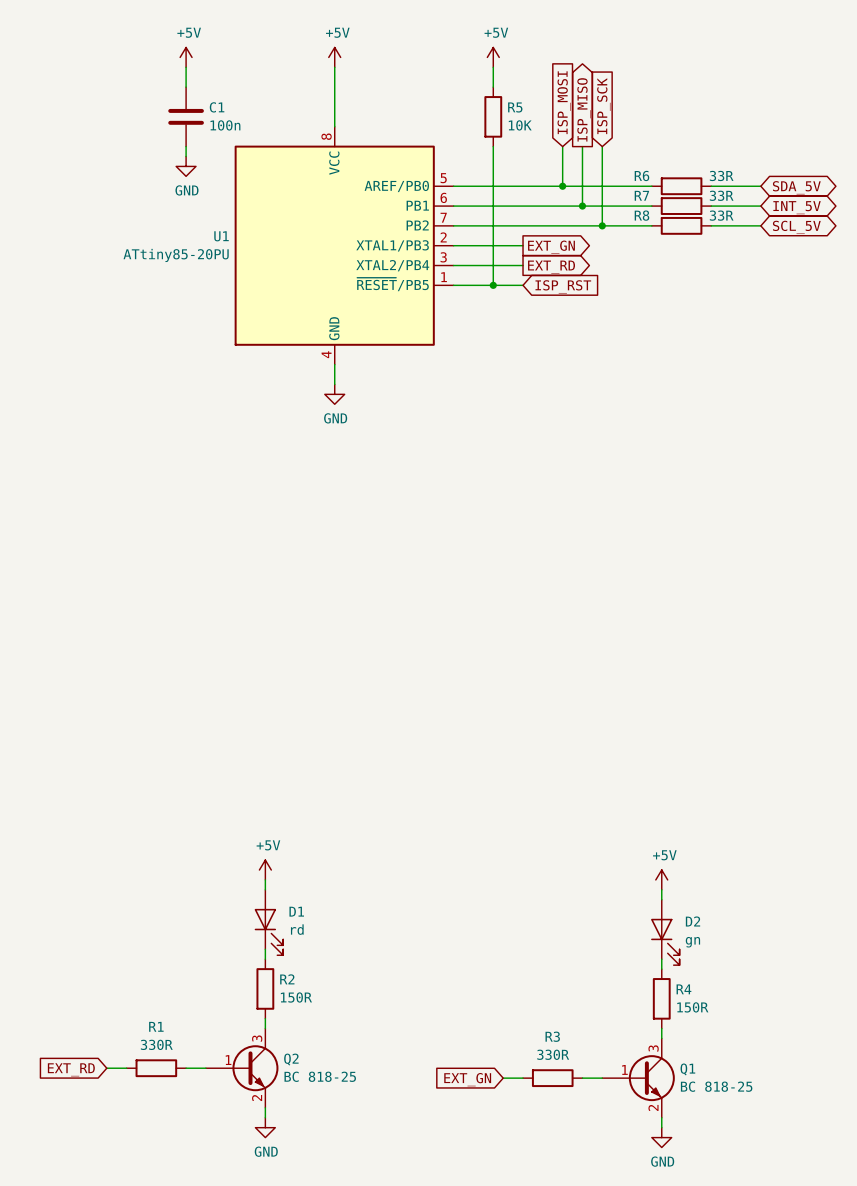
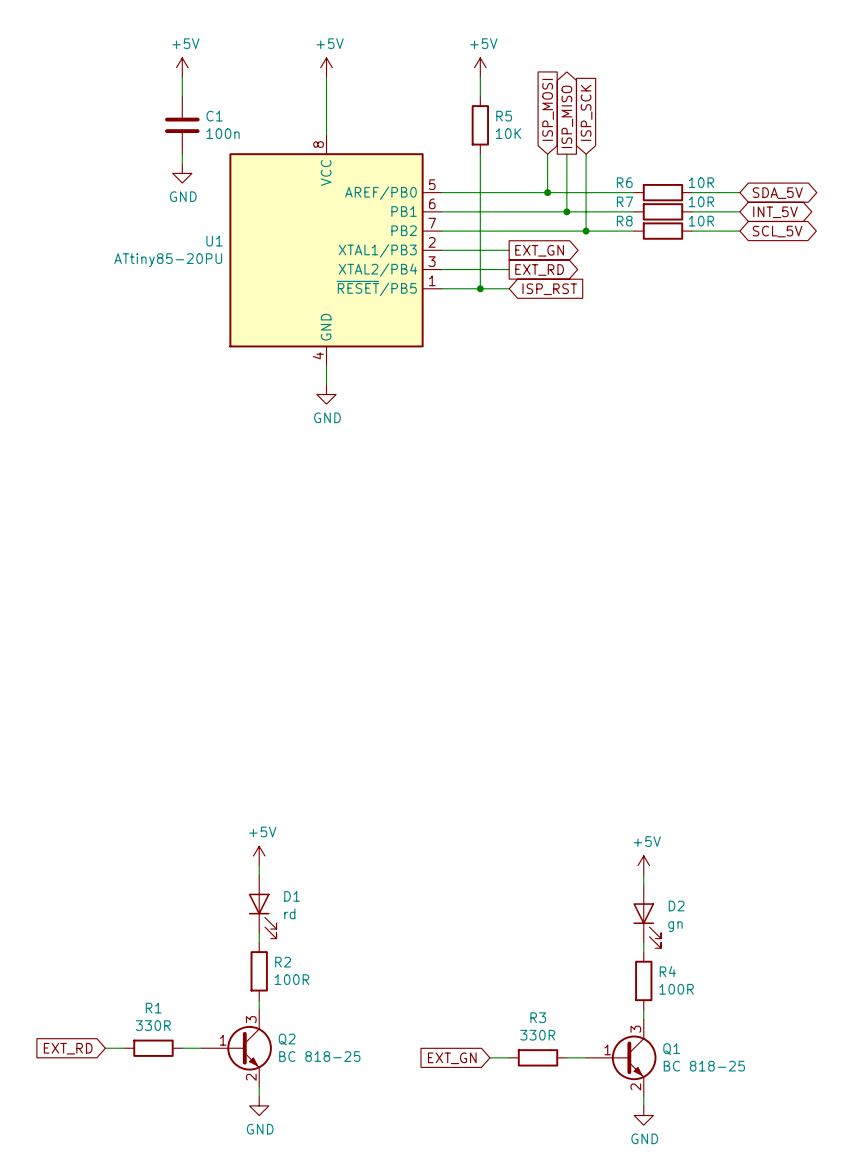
R6 value: 33R (721, 175) -> 10R (701, 182)
R7 value: 33R (721, 195) -> 10R (701, 201)
R8 value: 33R (721, 215) -> 10R (701, 221)
R2 value: 150R (296, 997) -> 100R (291, 979)
R4 value: 150R (692, 1007) -> 100R (676, 989)

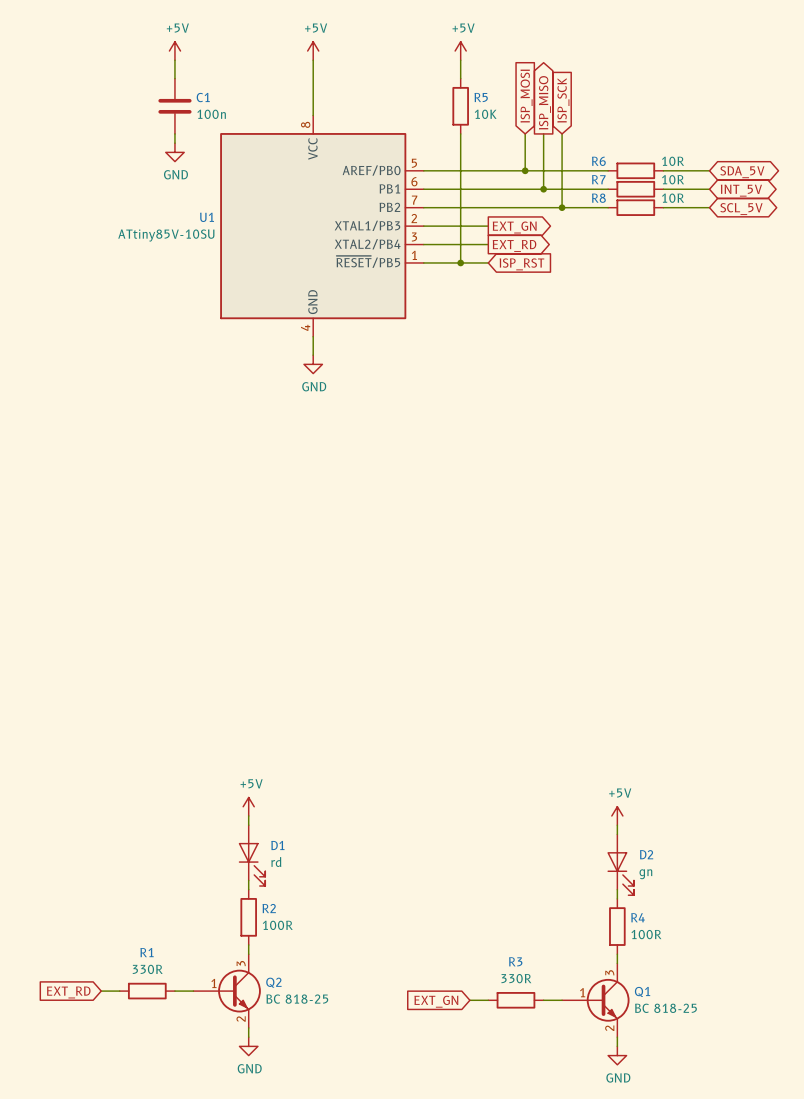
U1 value: ATtiny85-20PU (168, 260) -> ATtiny85V-10SU (166, 235)

